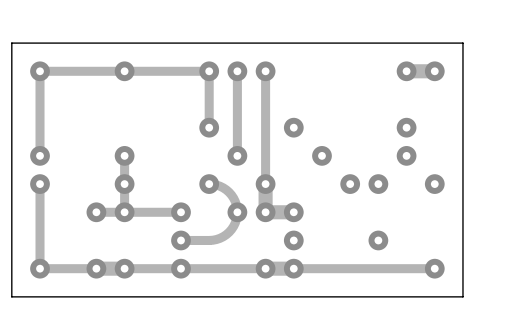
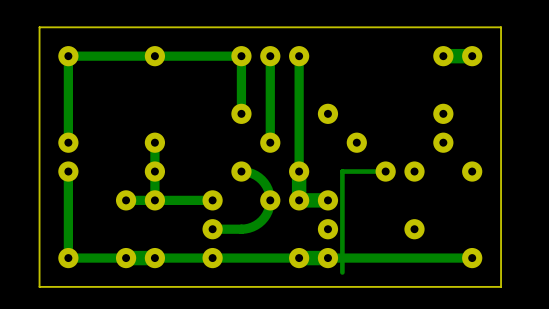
track: none -> (385, 171) (342, 171) (342, 272)

